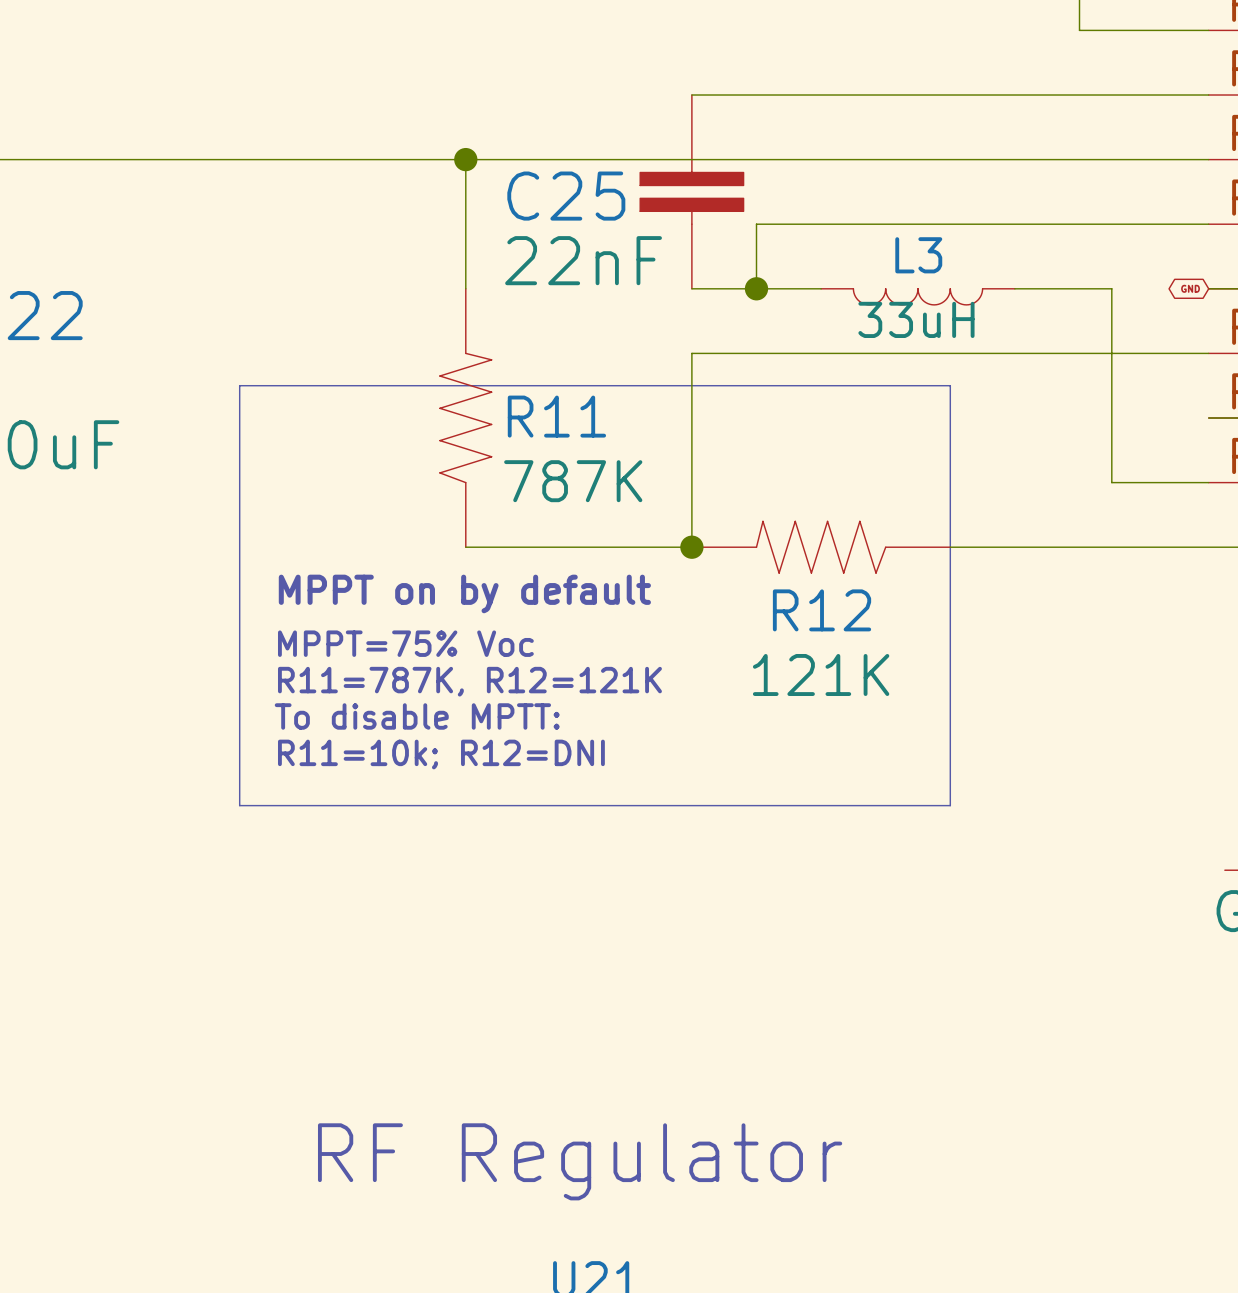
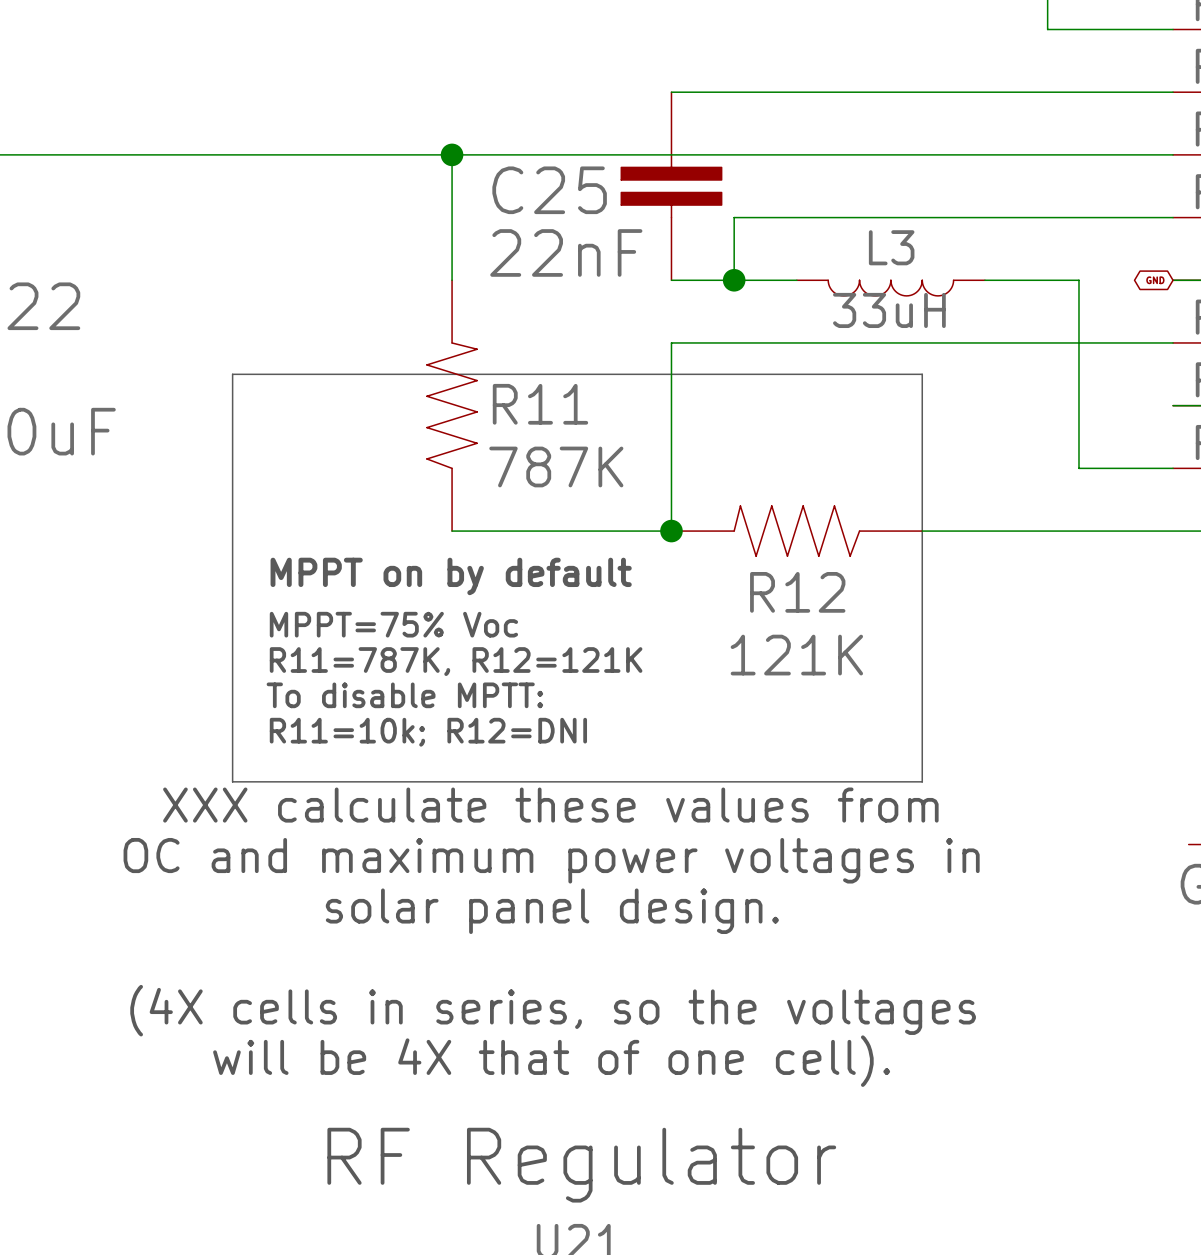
text: none -> XXX calculate these values from (550, 805)
text: none -> OC and maximum power voltages in (551, 860)
text: none -> solar panel design. (552, 911)
text: none -> (4X cells in series, so the voltages (553, 1010)
text: none -> will be 4X that of one cell). (551, 1061)
text position: RF Regulator (580, 1161) -> RF Regulator (581, 1165)

